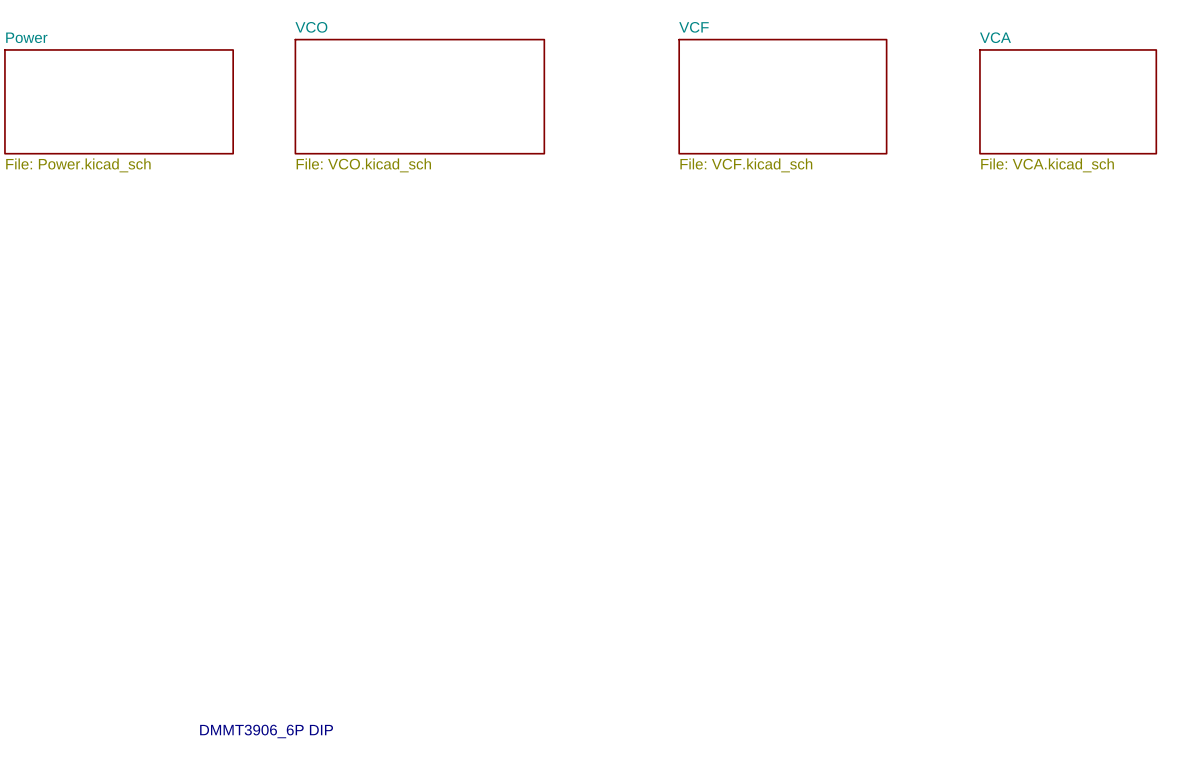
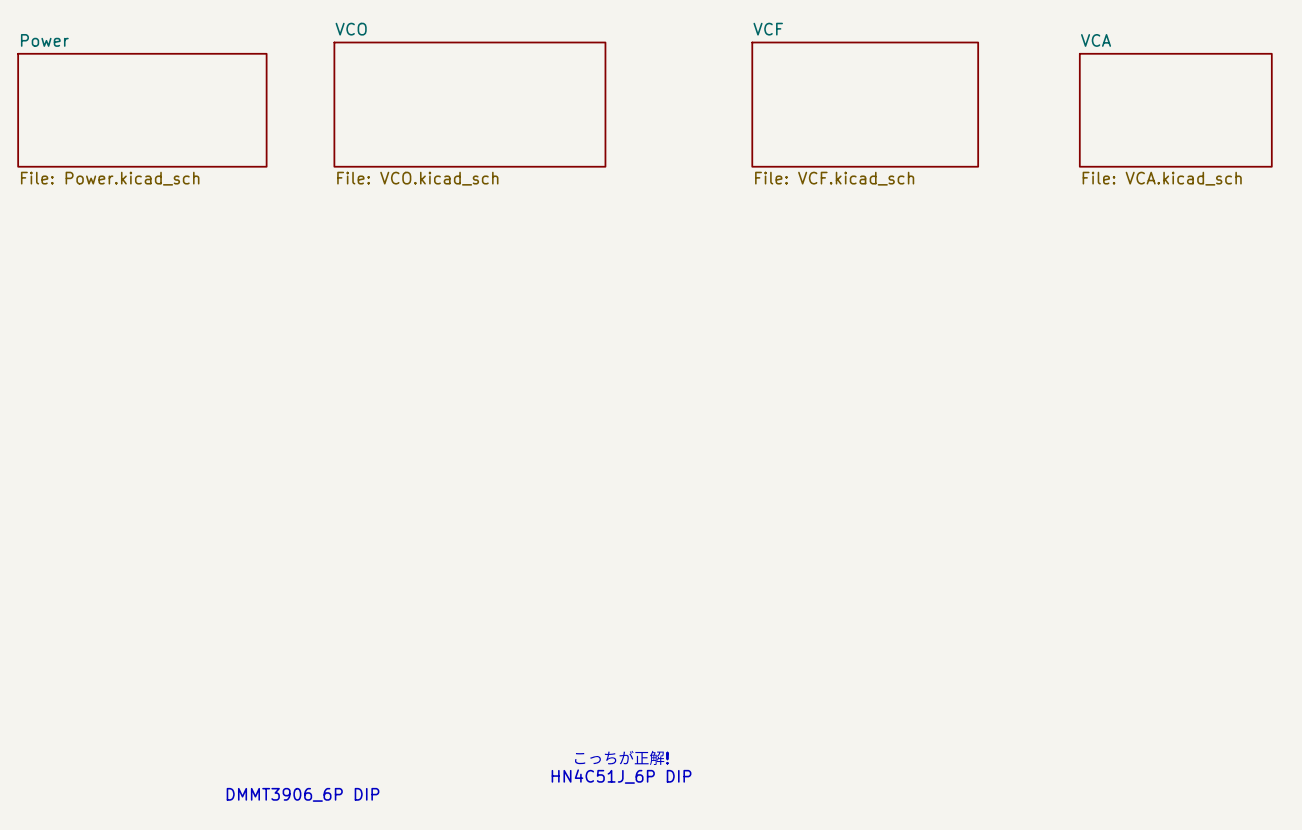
text: none -> こっちが正解! (621, 757)
text: none -> HN4C51J_6P DIP (621, 776)

